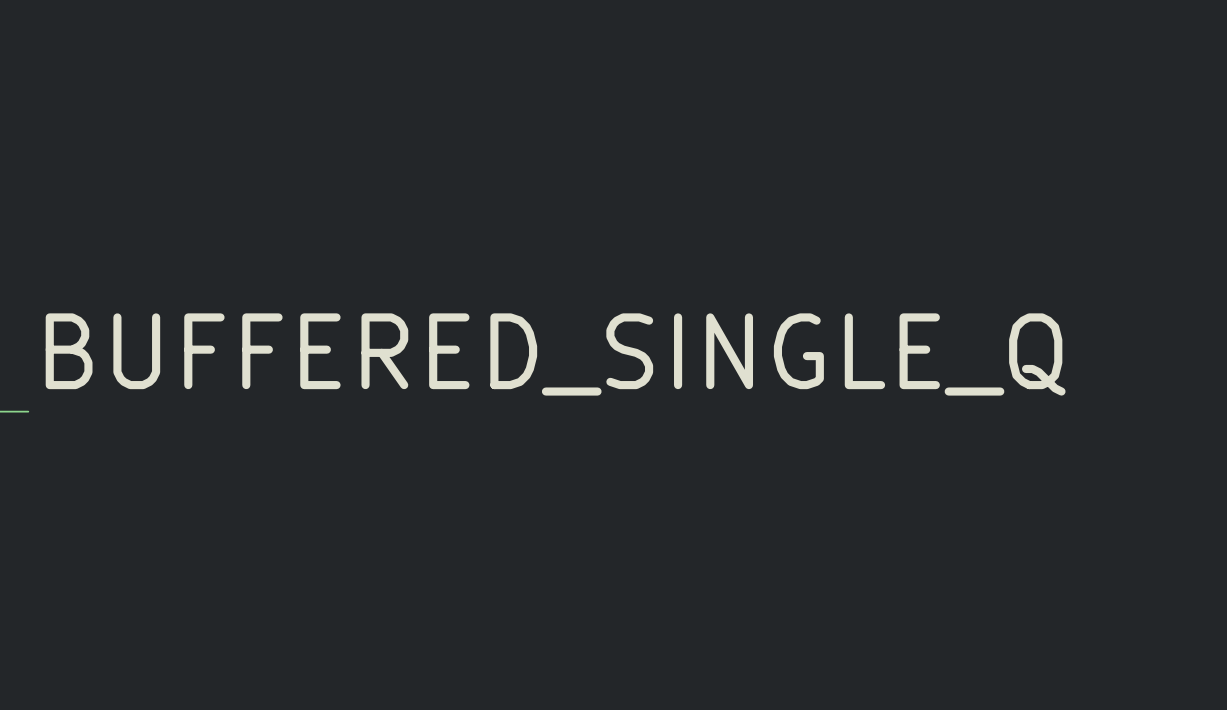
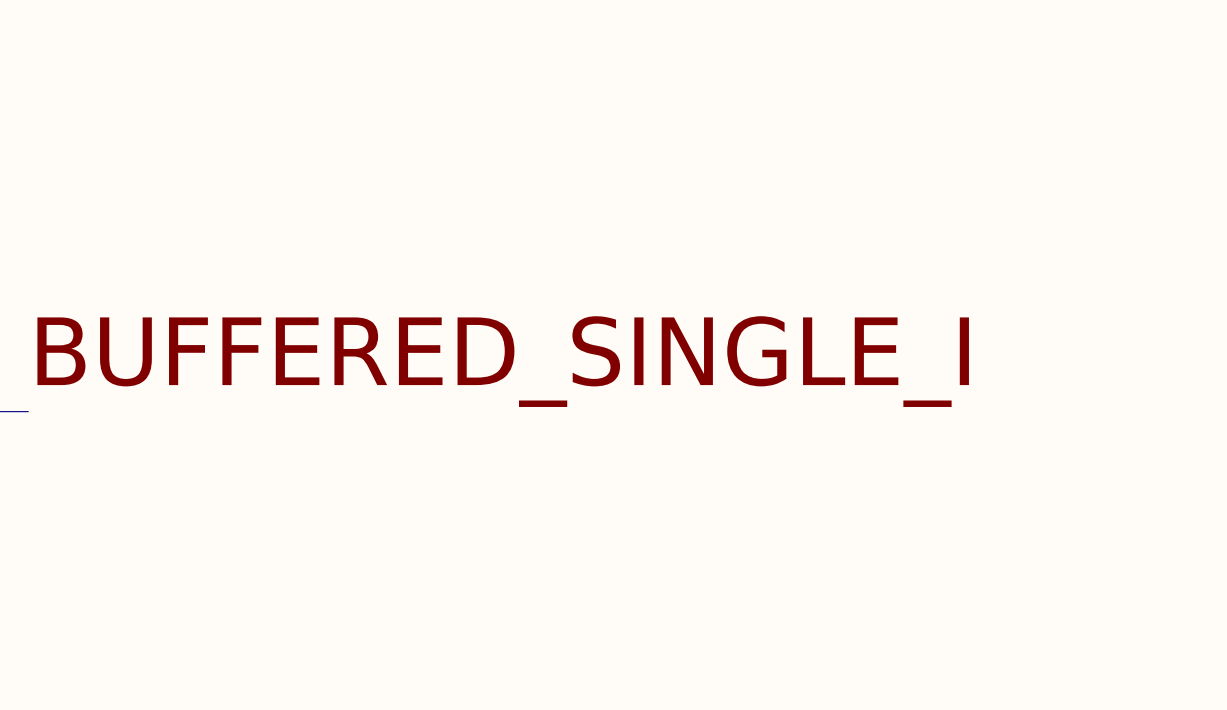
label: BUFFERED_SINGLE_Q (555, 354) -> BUFFERED_SINGLE_I (503, 361)

